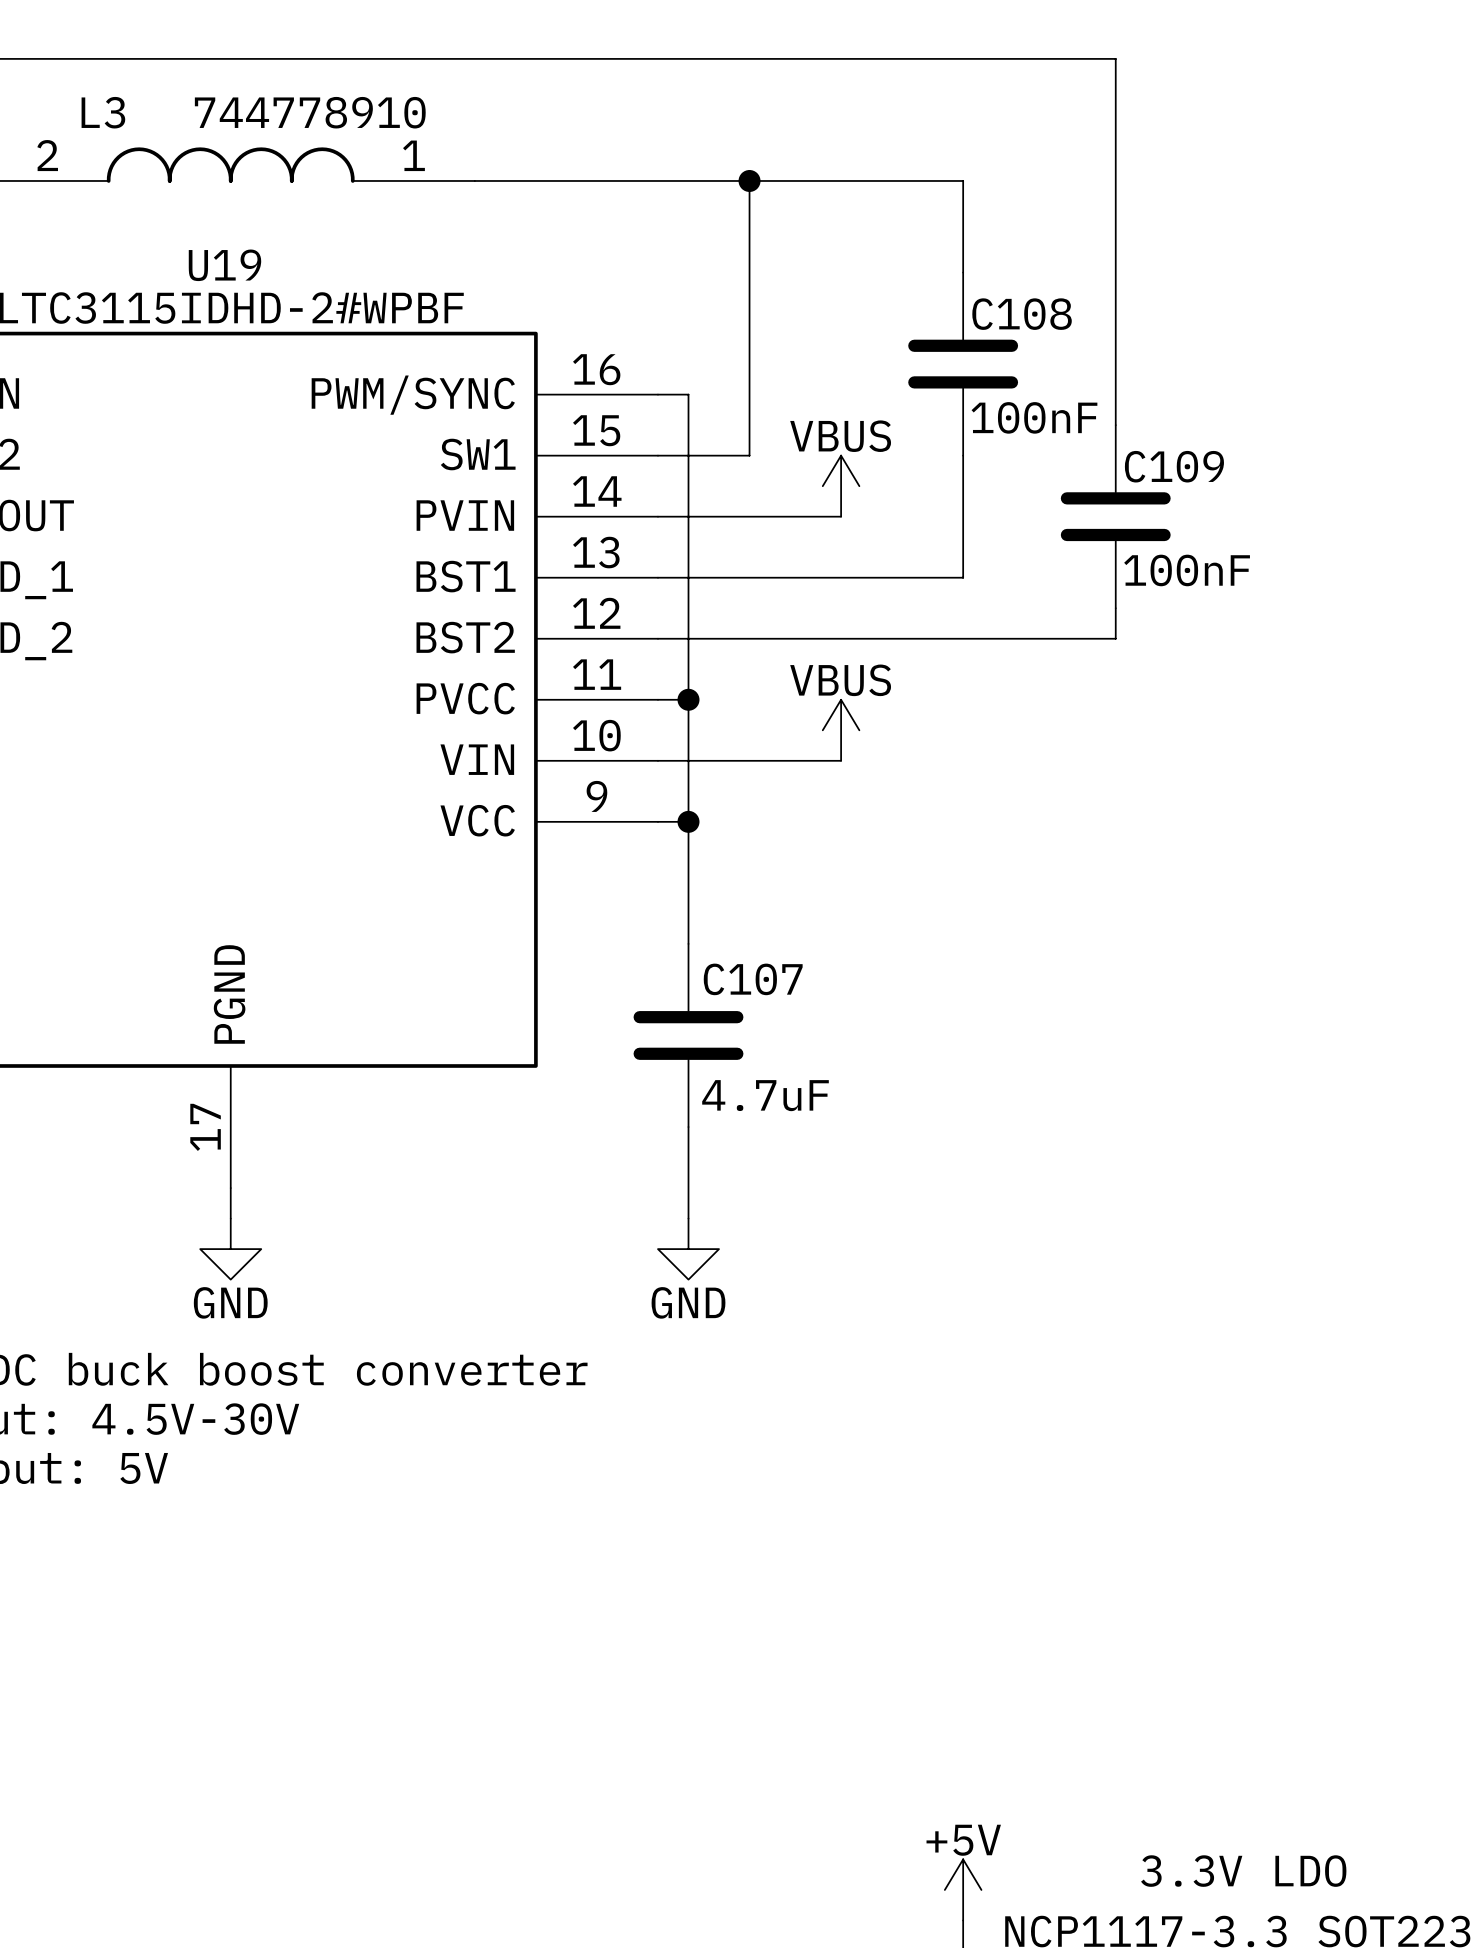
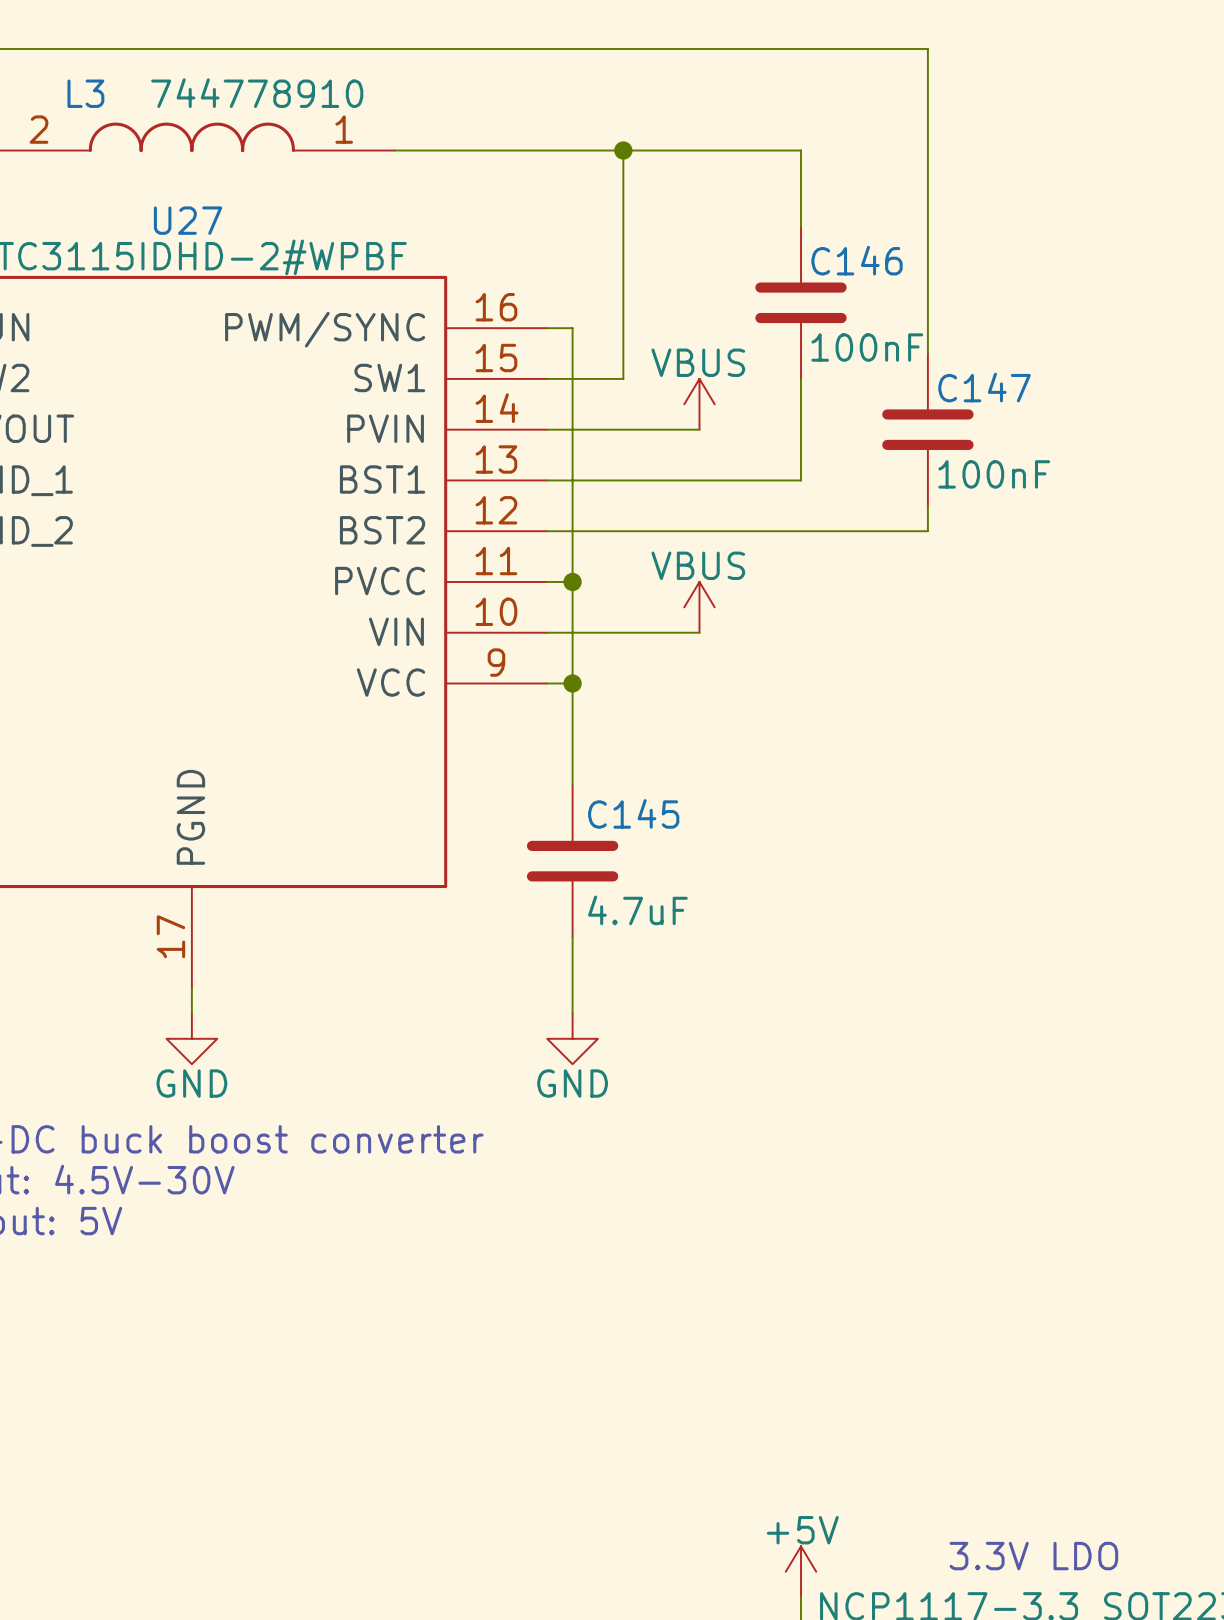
U19 name: U19 (224, 265) -> U27 (188, 220)
C108 name: C108 (1022, 314) -> C146 (857, 260)
C109 name: C109 (1174, 466) -> C147 (984, 387)
C107 name: C107 (753, 979) -> C145 (633, 813)

